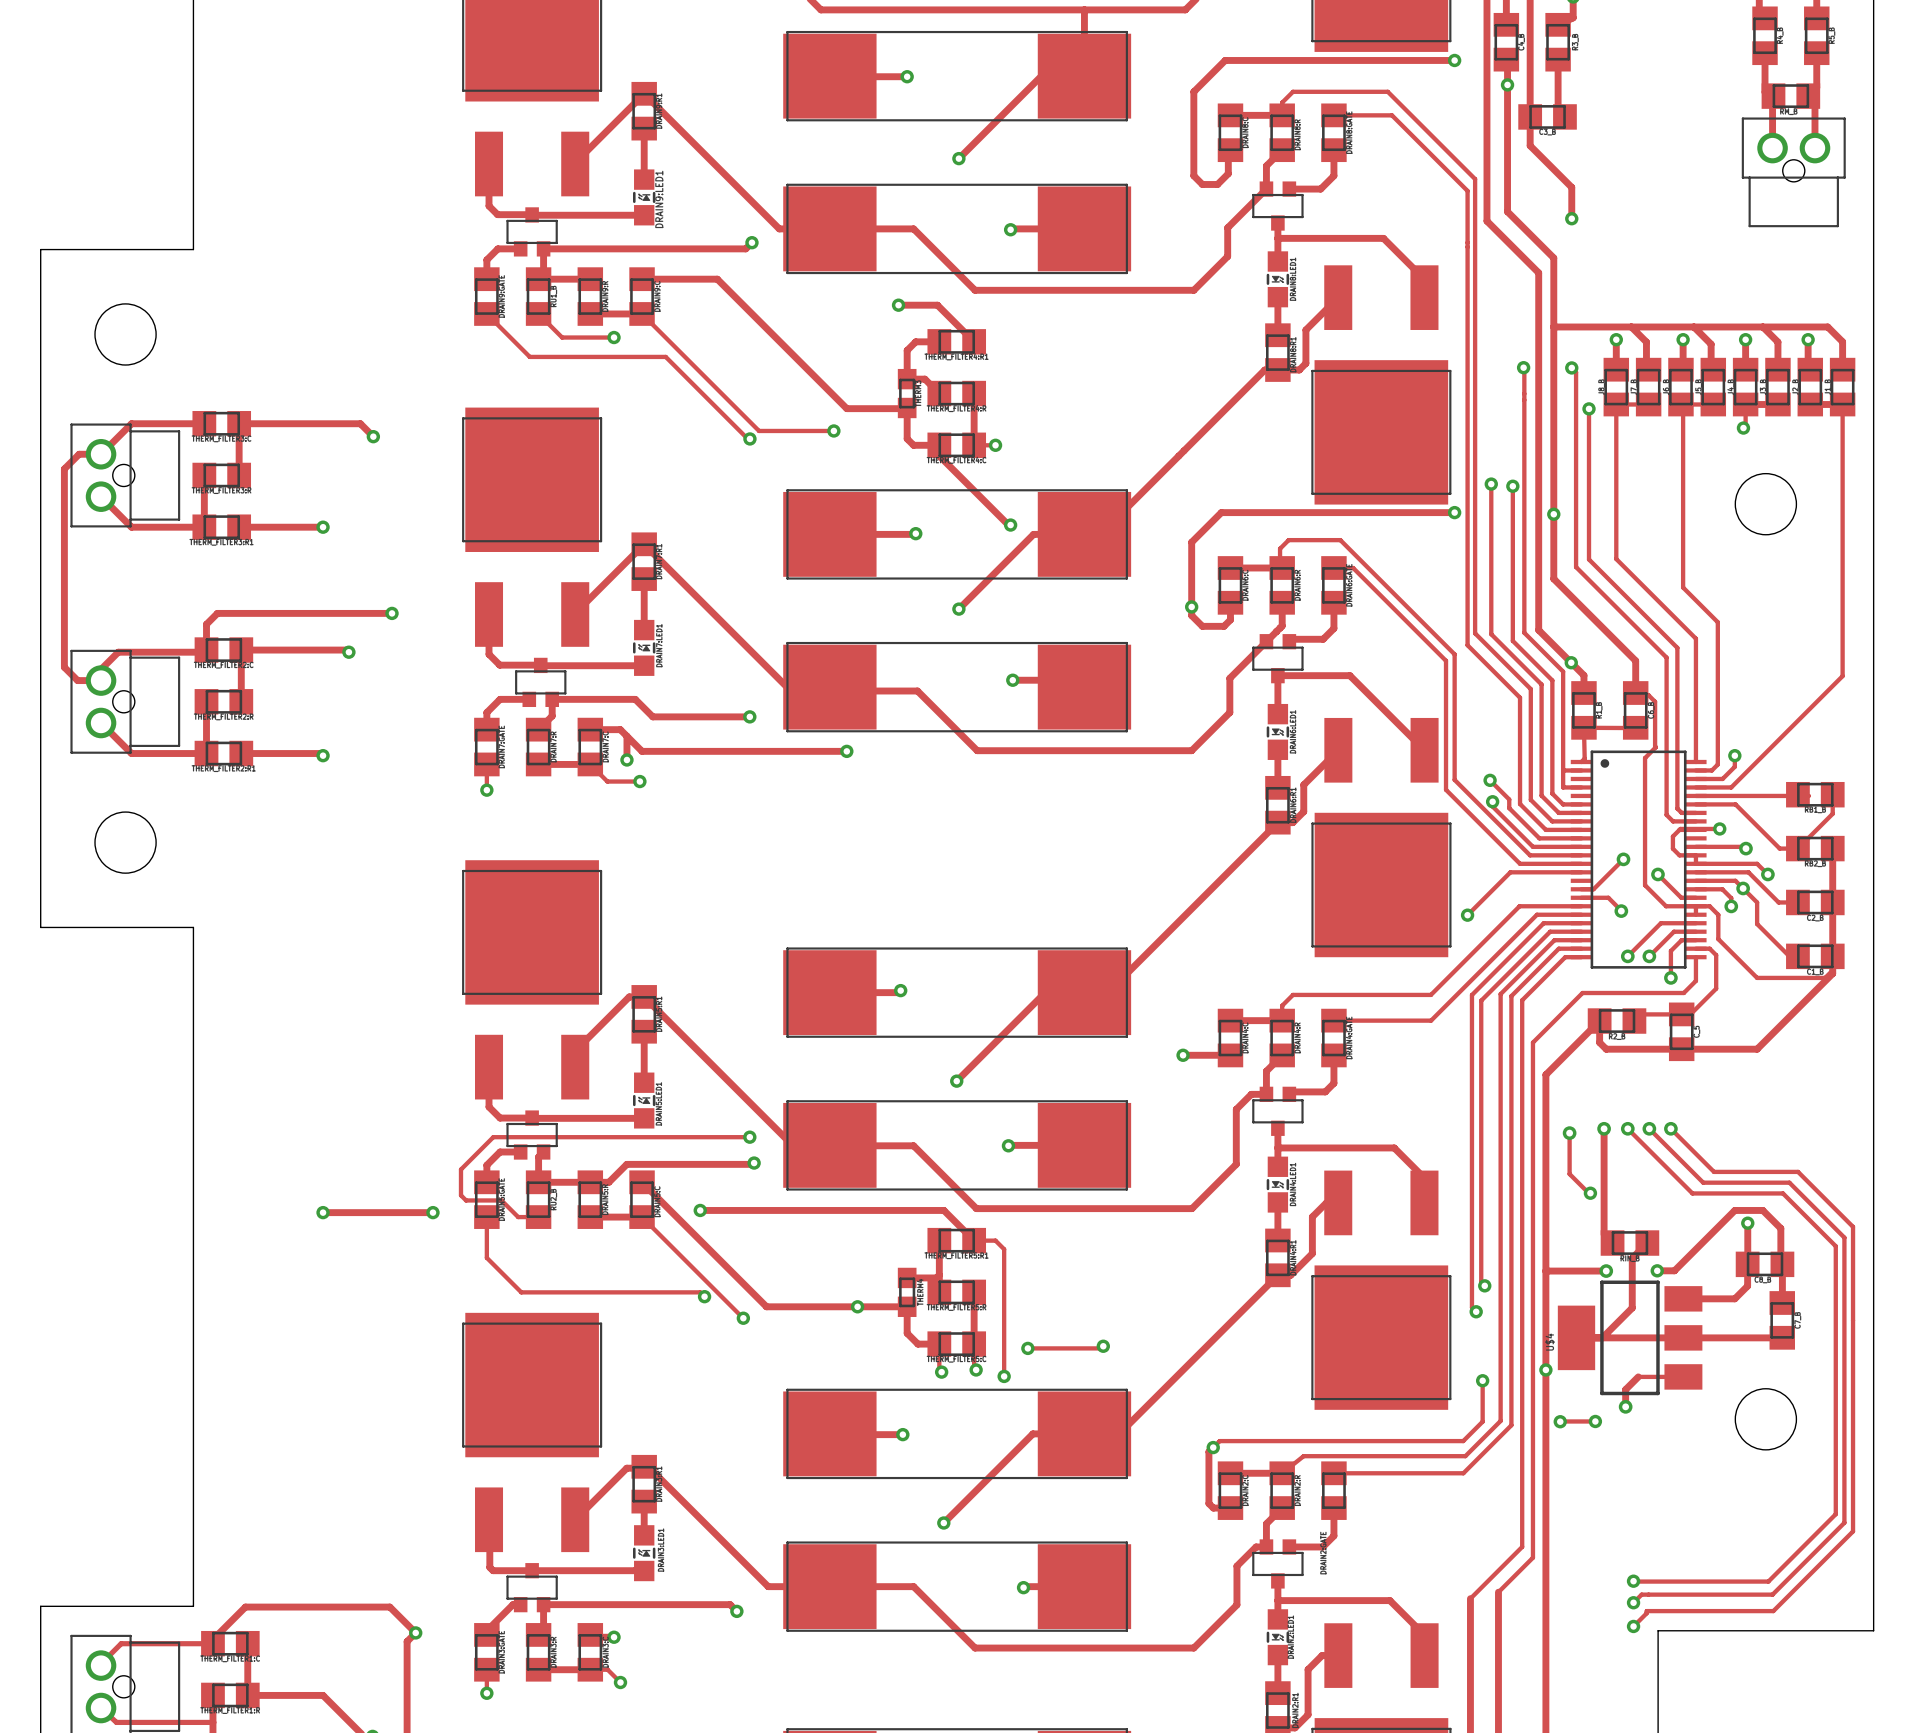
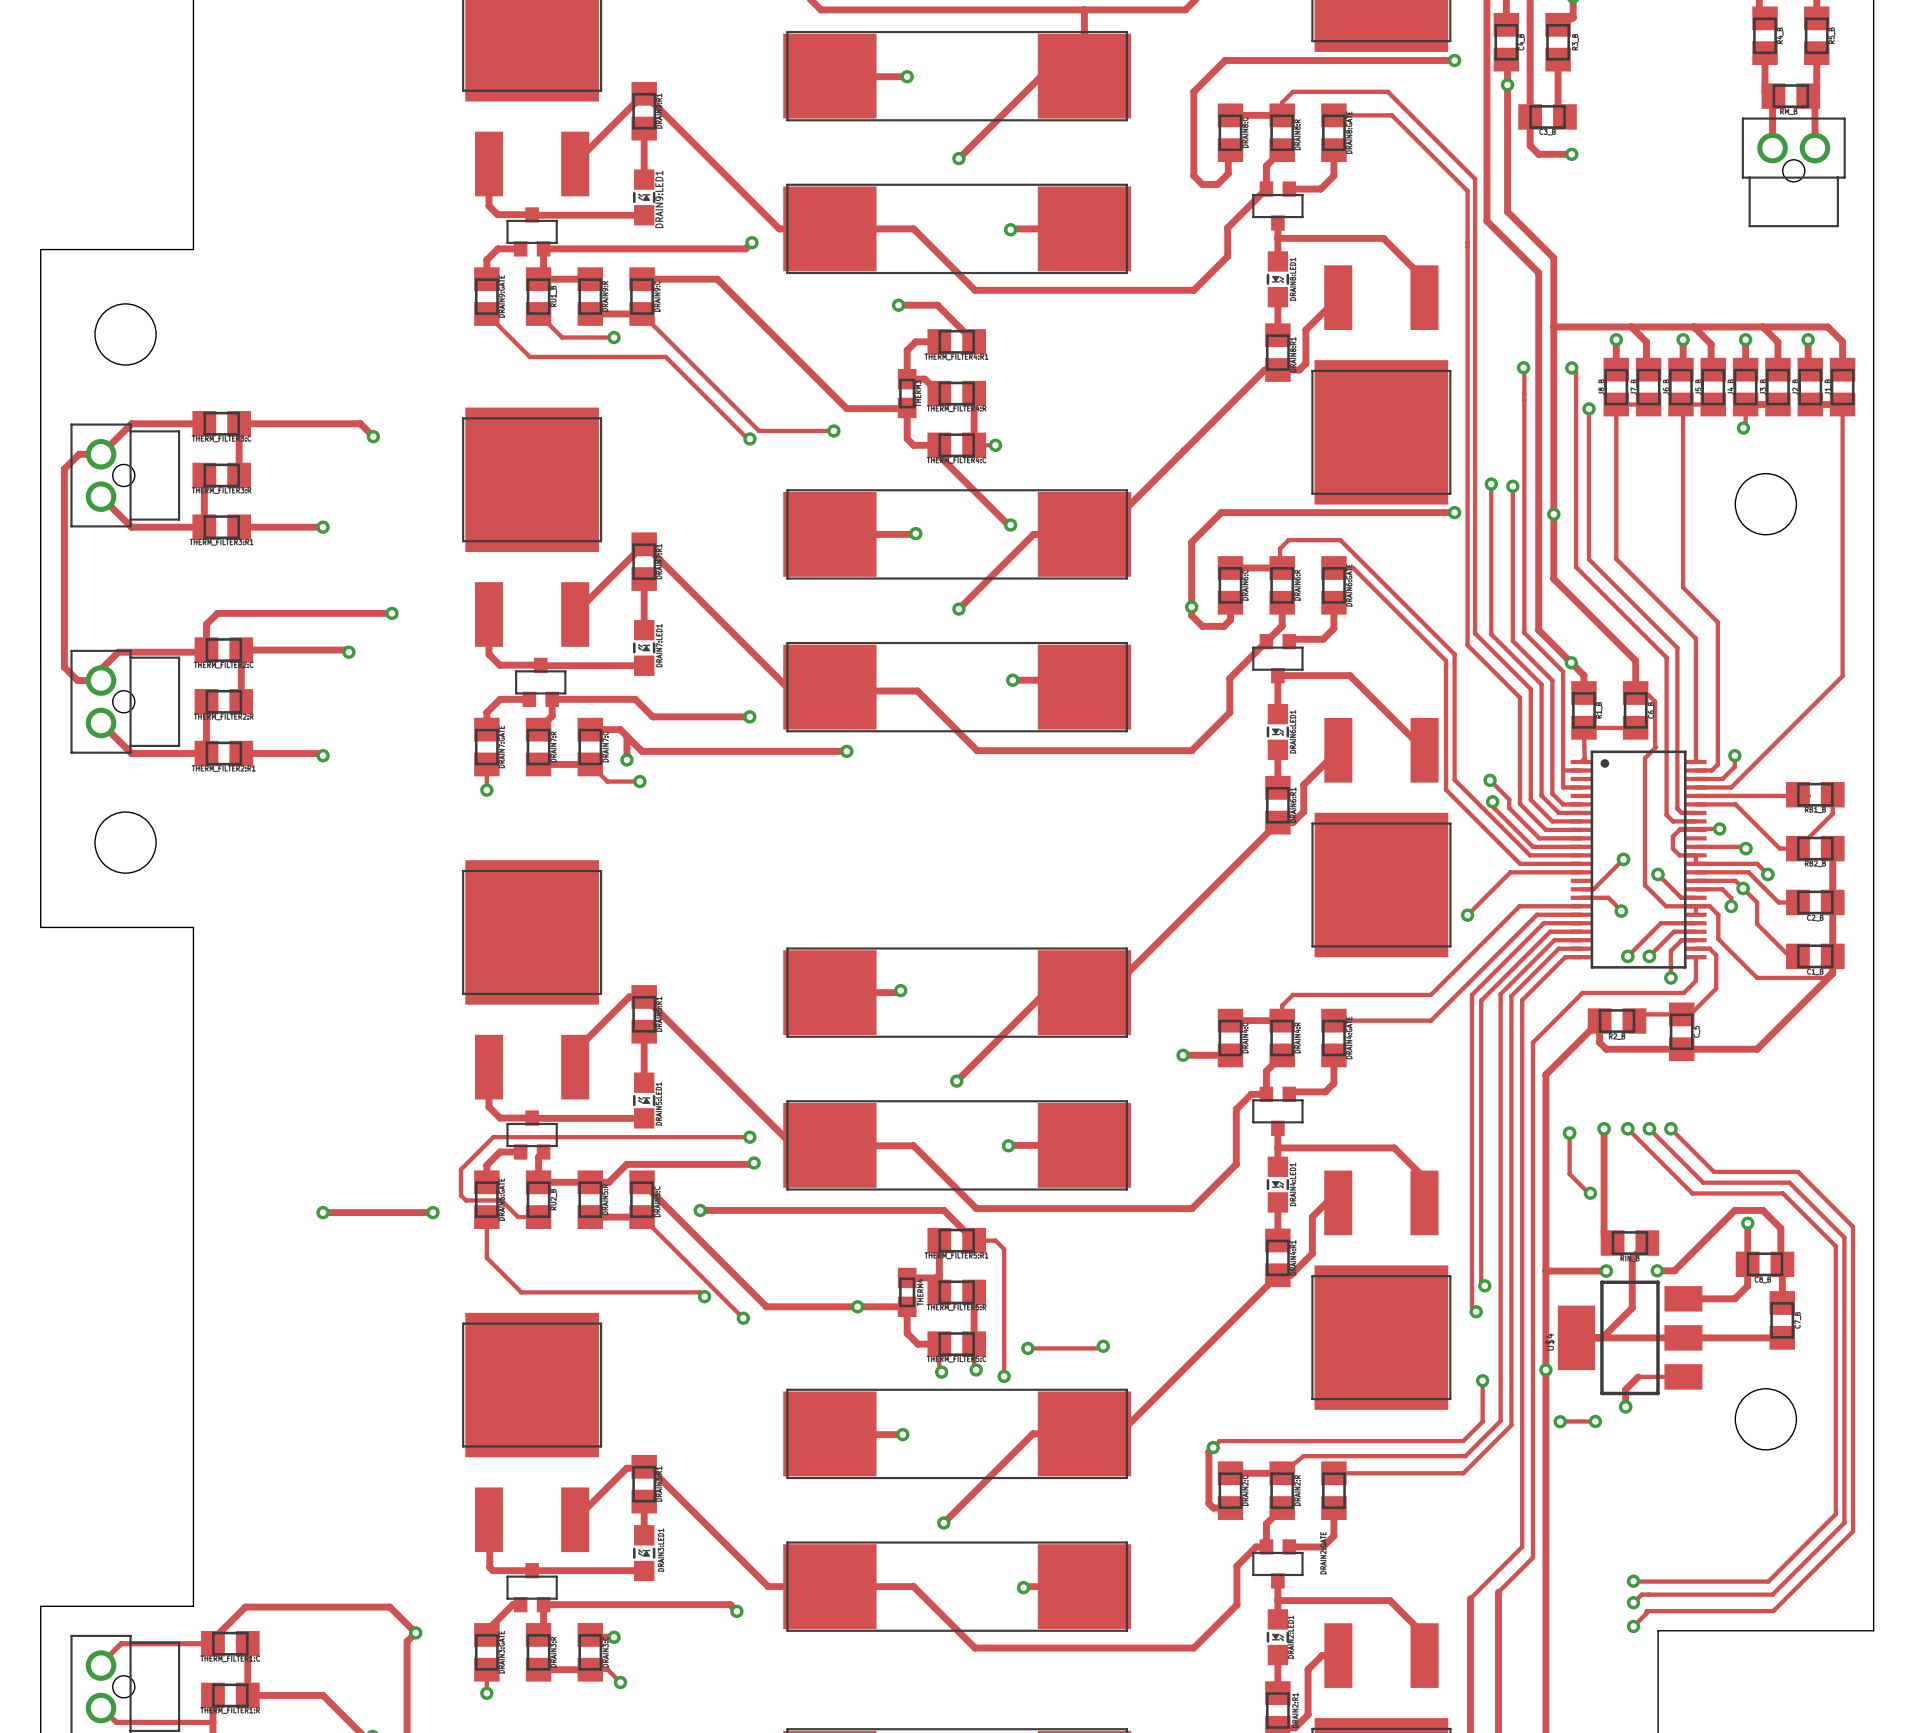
track: (1538, 154) (1571, 187) (1571, 218) -> (1538, 154) (1571, 154)
via position: (1571, 218) -> (1571, 154)

